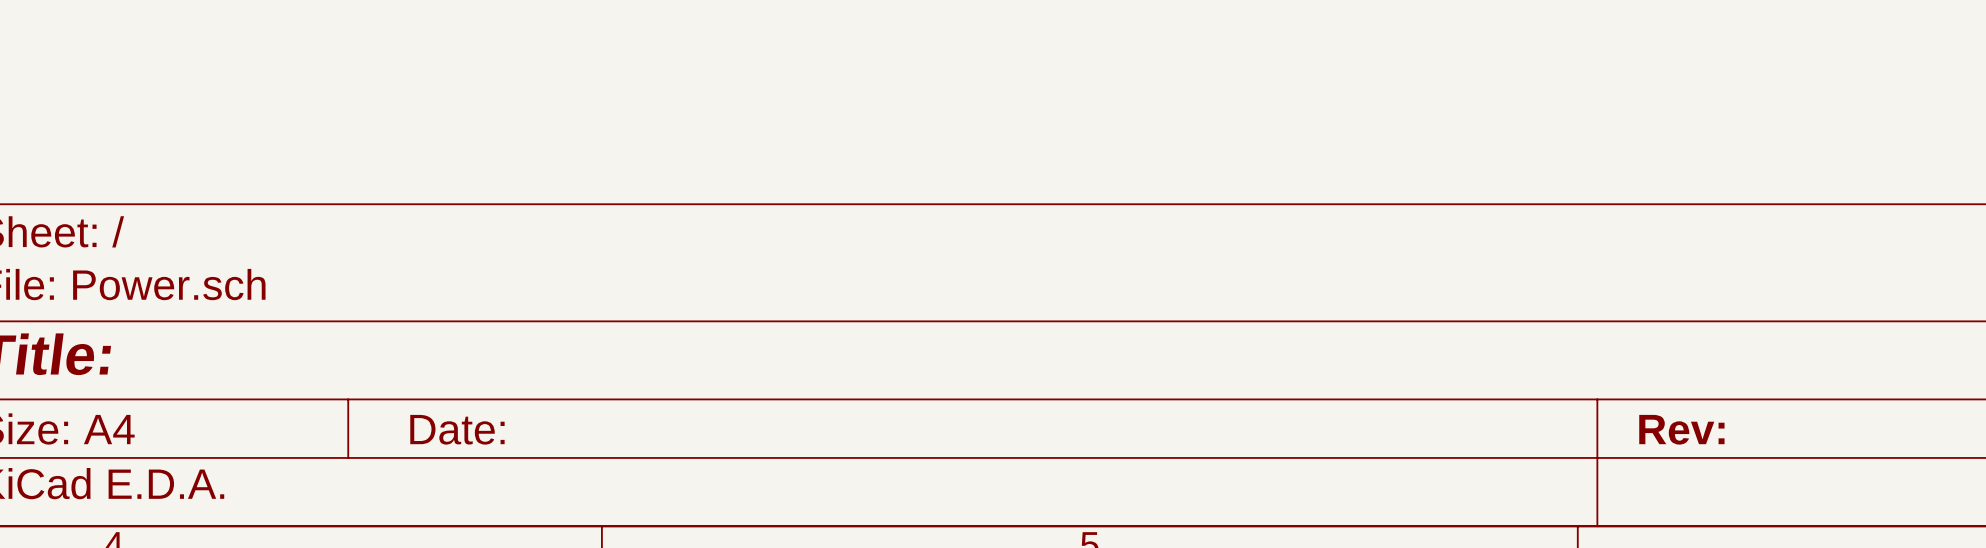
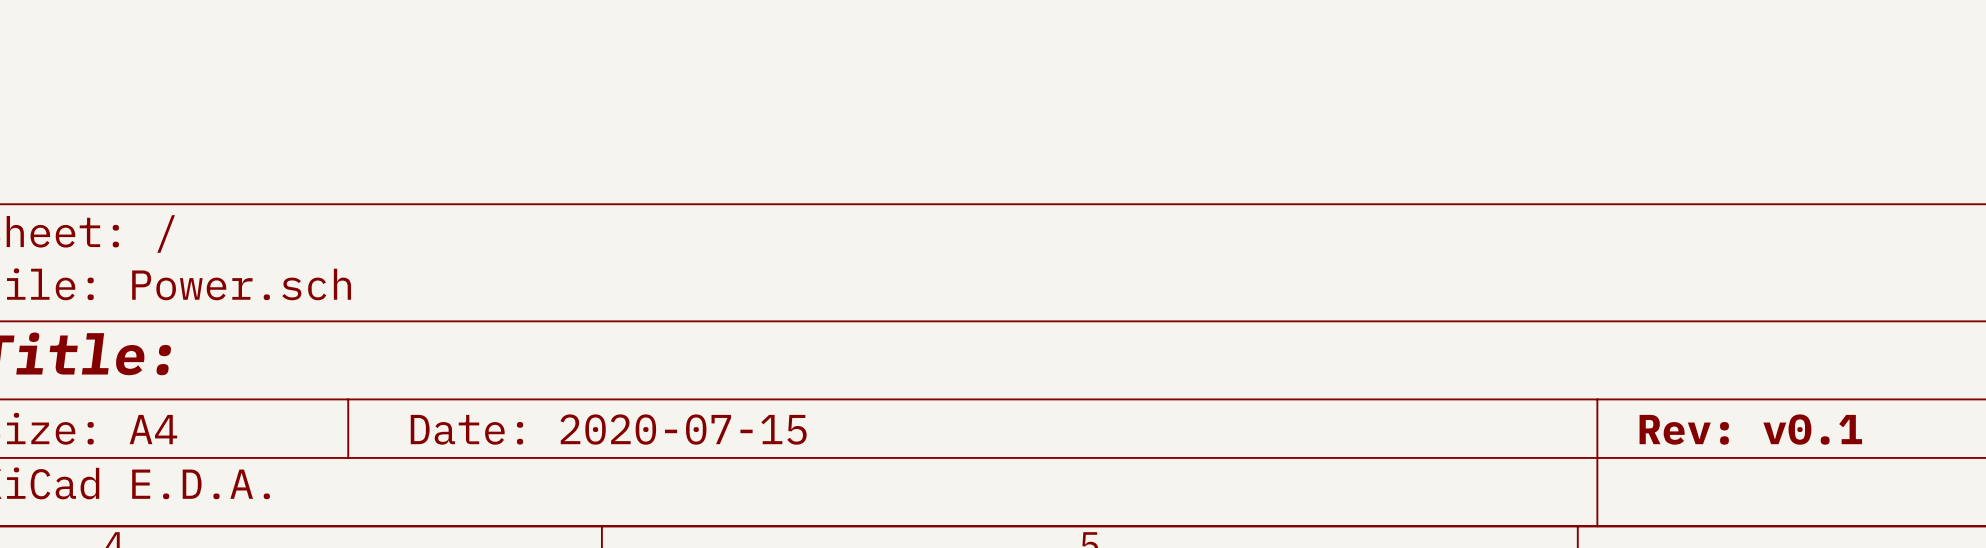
title block: Date: (457, 429) -> Date: 2020-07-15 (608, 429)
title block: Rev: (1681, 429) -> Rev: v0.1 (1750, 429)

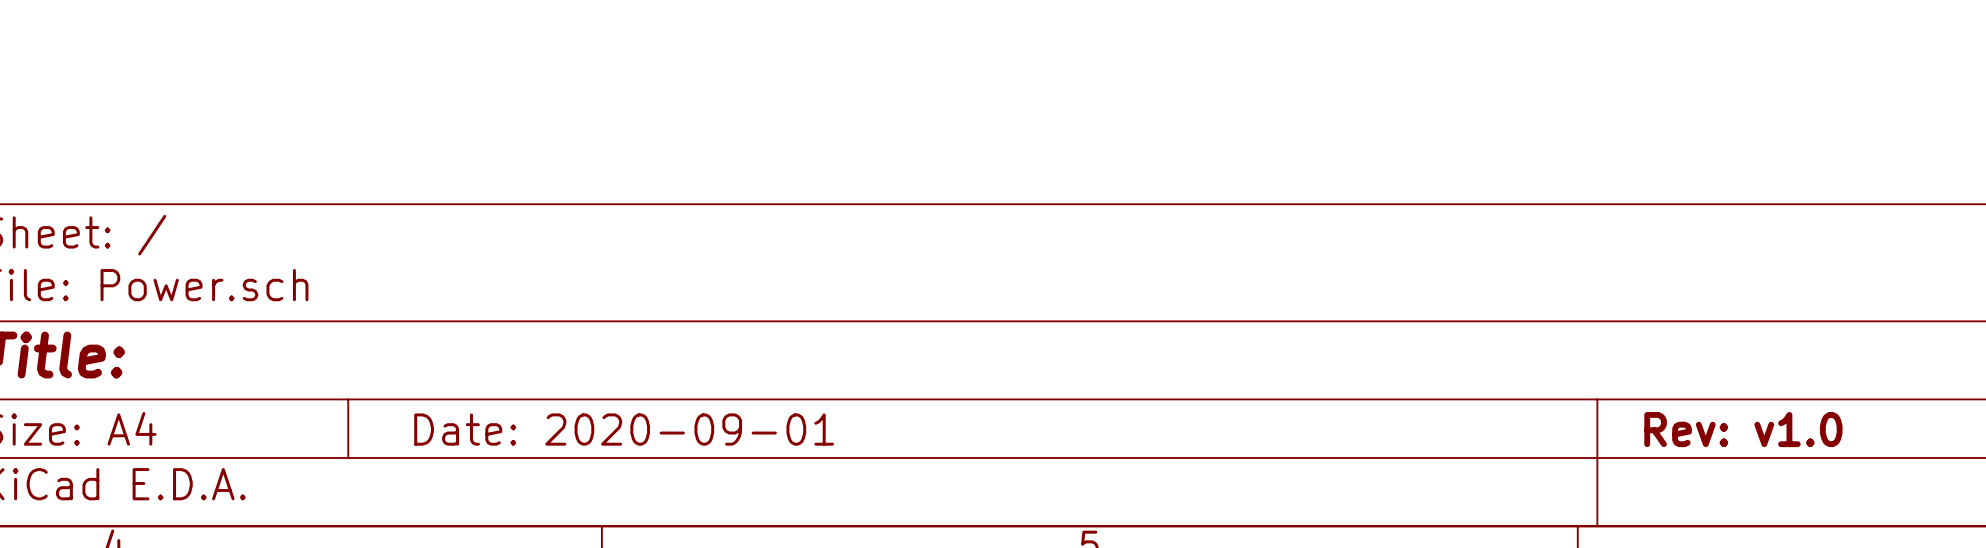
title block: Date: 2020-07-15 (608, 429) -> Date: 2020-09-01 (624, 429)
title block: Rev: v0.1 (1750, 429) -> Rev: v1.0 (1743, 429)

